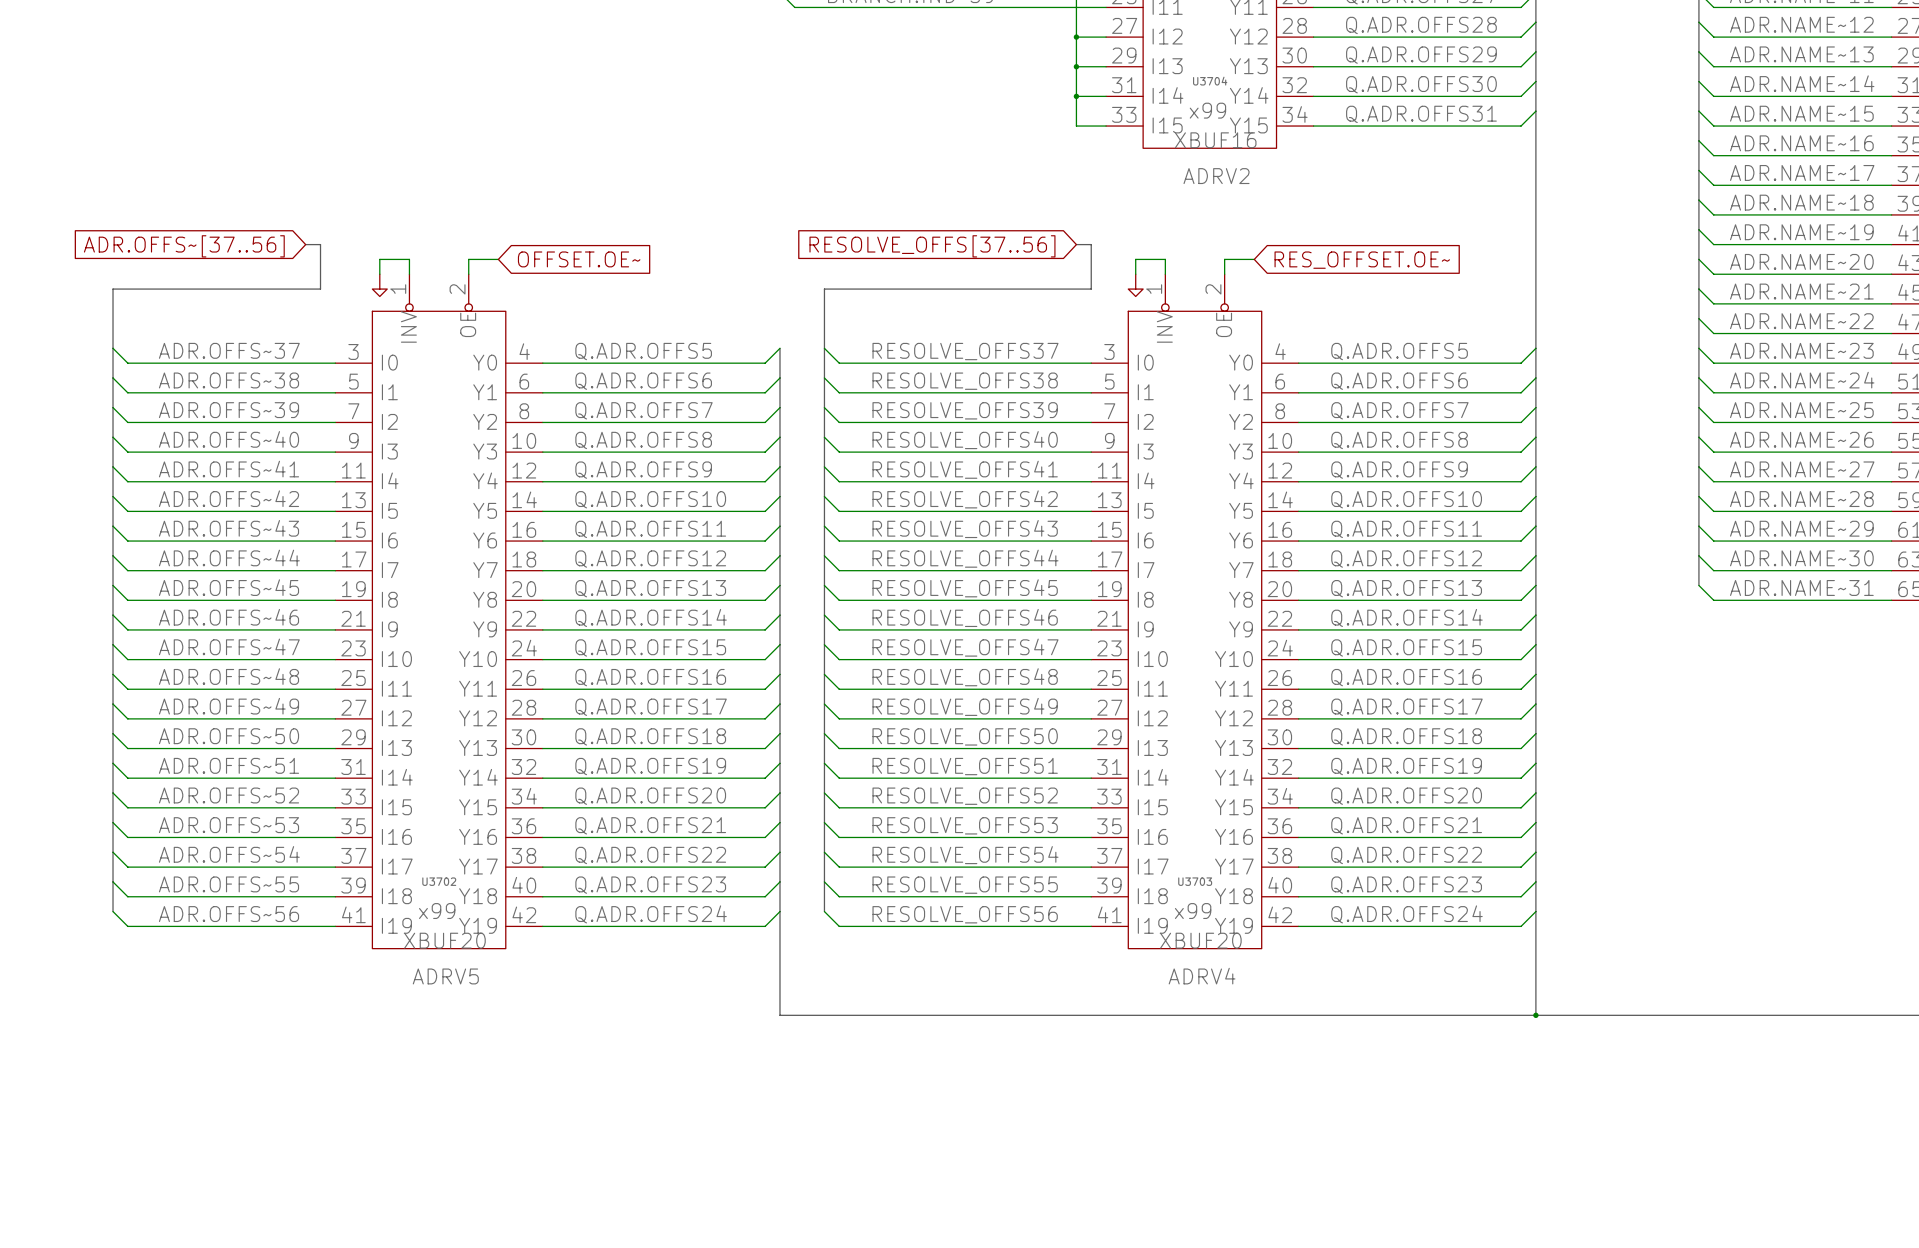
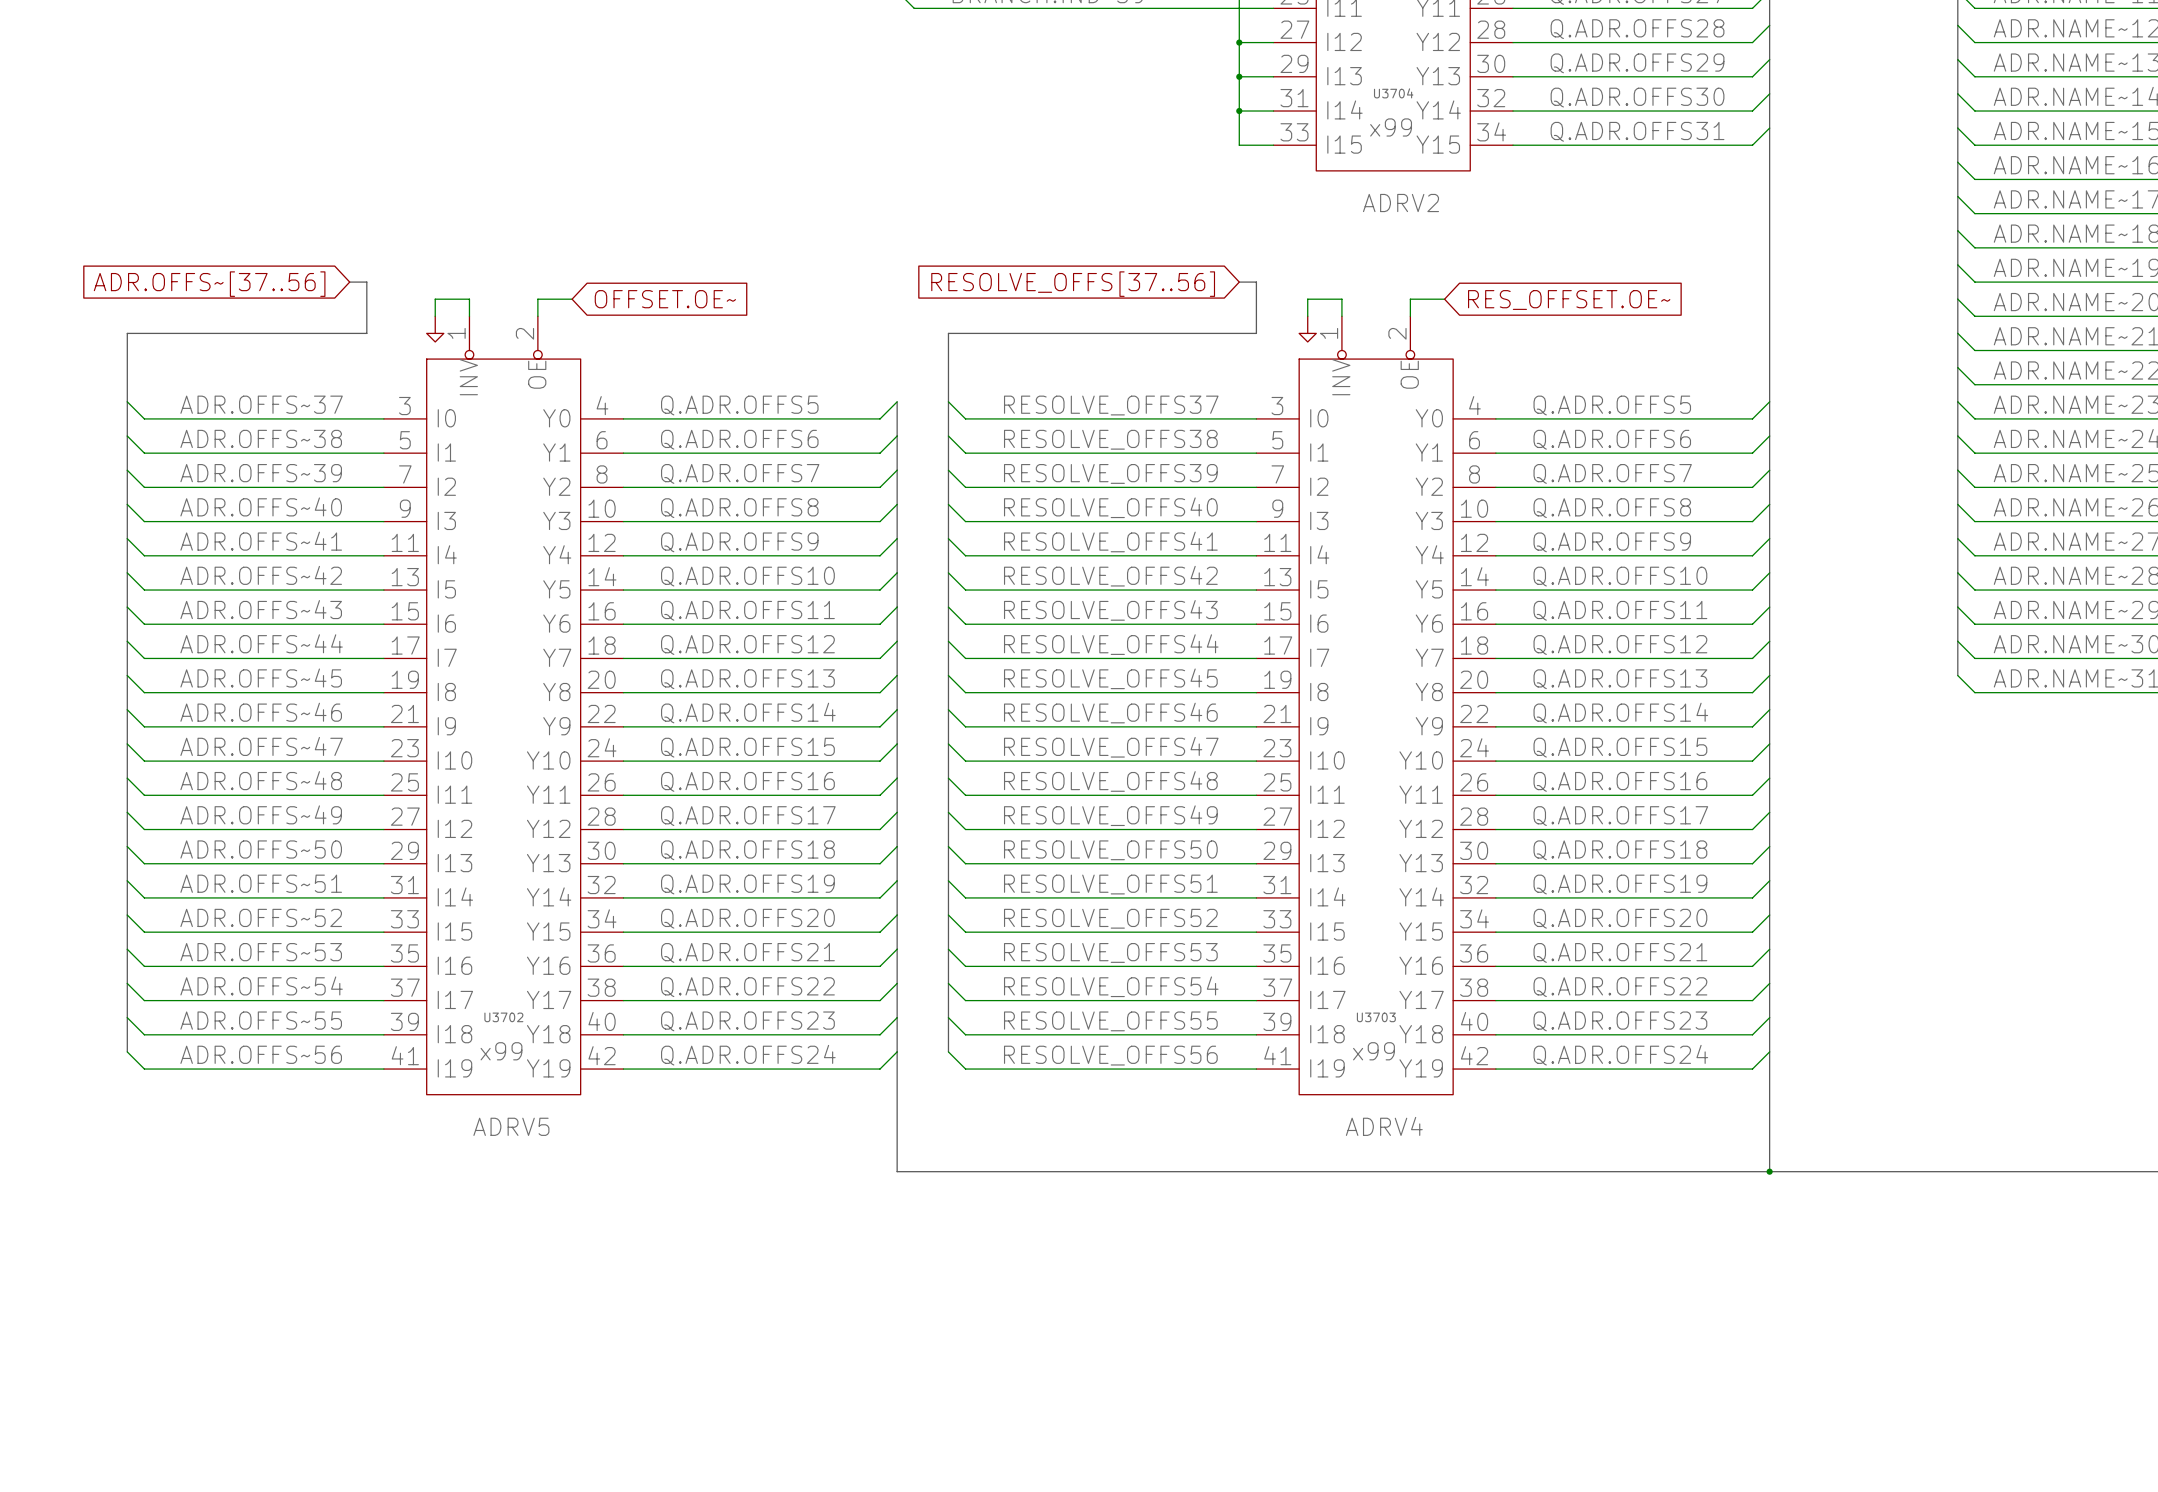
U3704 value: XBUF16 (1215, 140) -> none
U3702 value: XBUF20 (444, 940) -> none
U3703 value: XBUF20 (1200, 940) -> none

